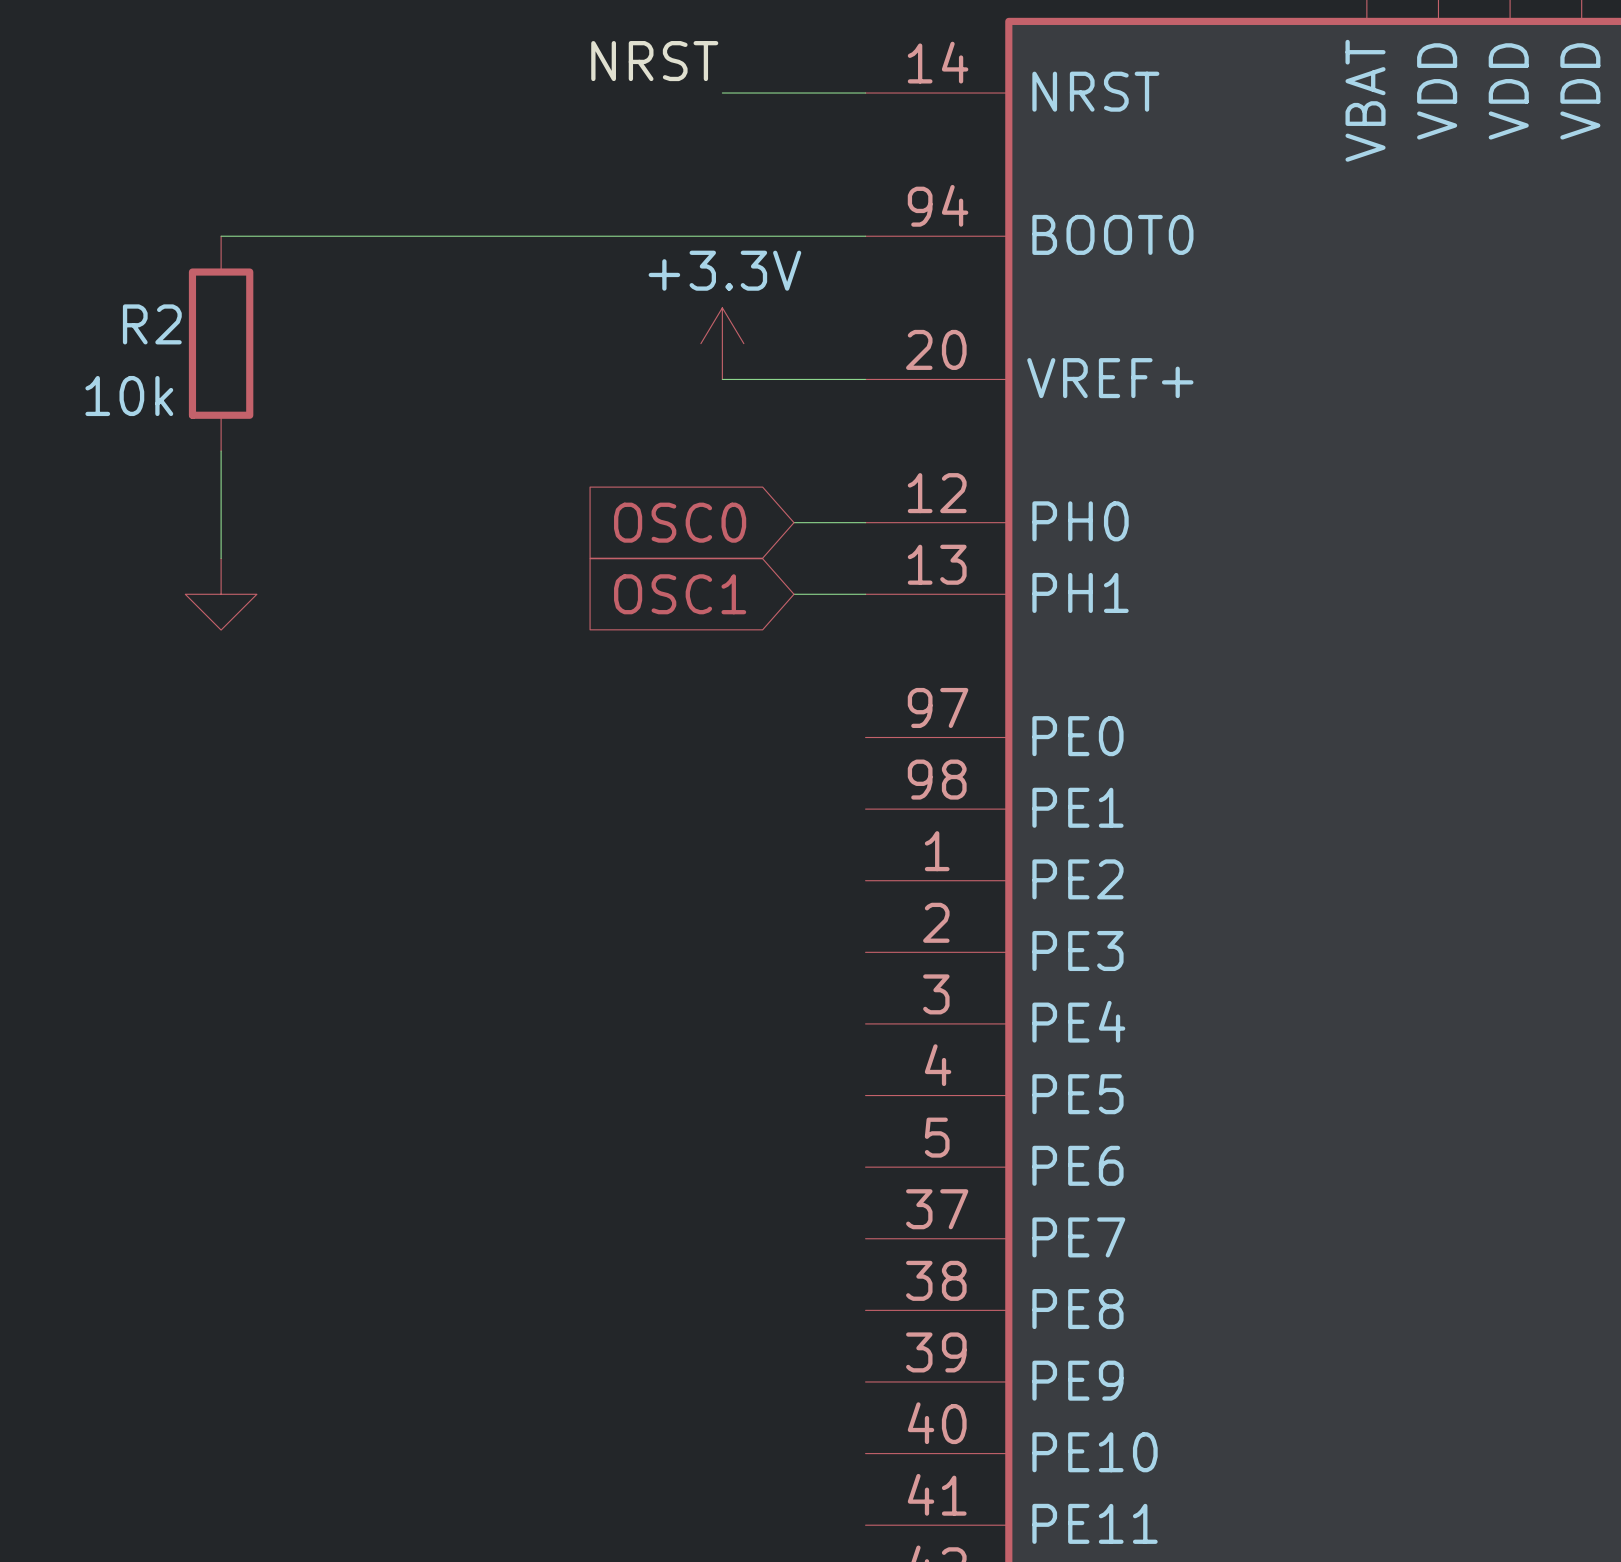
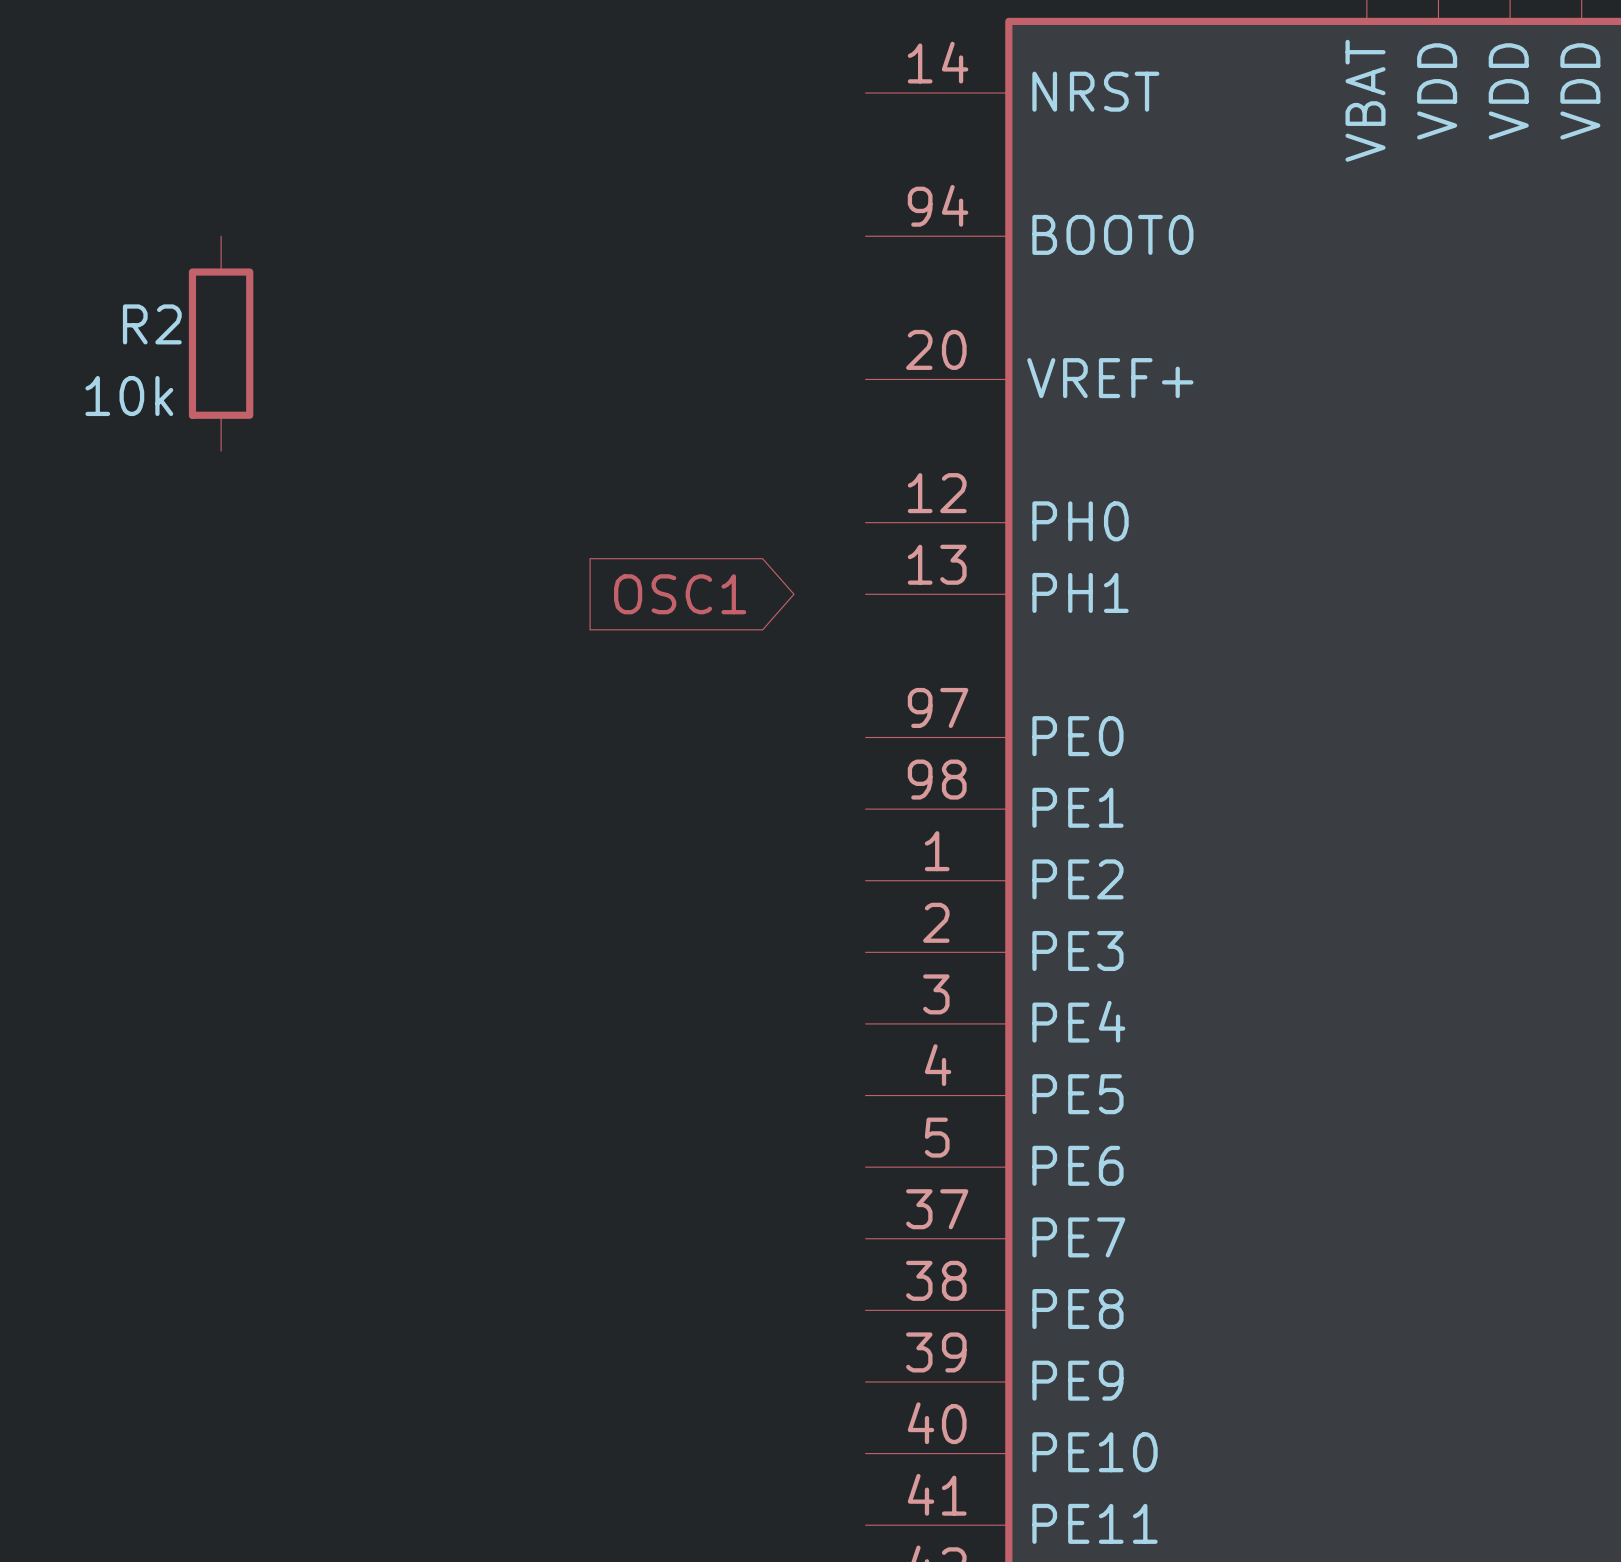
label: NRST (654, 61) -> none
wire: (722, 93) (865, 93) -> none
wire: (221, 236) (865, 236) -> none
power symbol: +3.3V (722, 343) -> none
wire: (722, 379) (865, 379) -> none
wire: (221, 451) (221, 558) -> none
global label: OSC0 (680, 522) -> none
wire: (793, 522) (865, 522) -> none
power symbol: (221, 594) -> none
wire: (793, 594) (865, 594) -> none

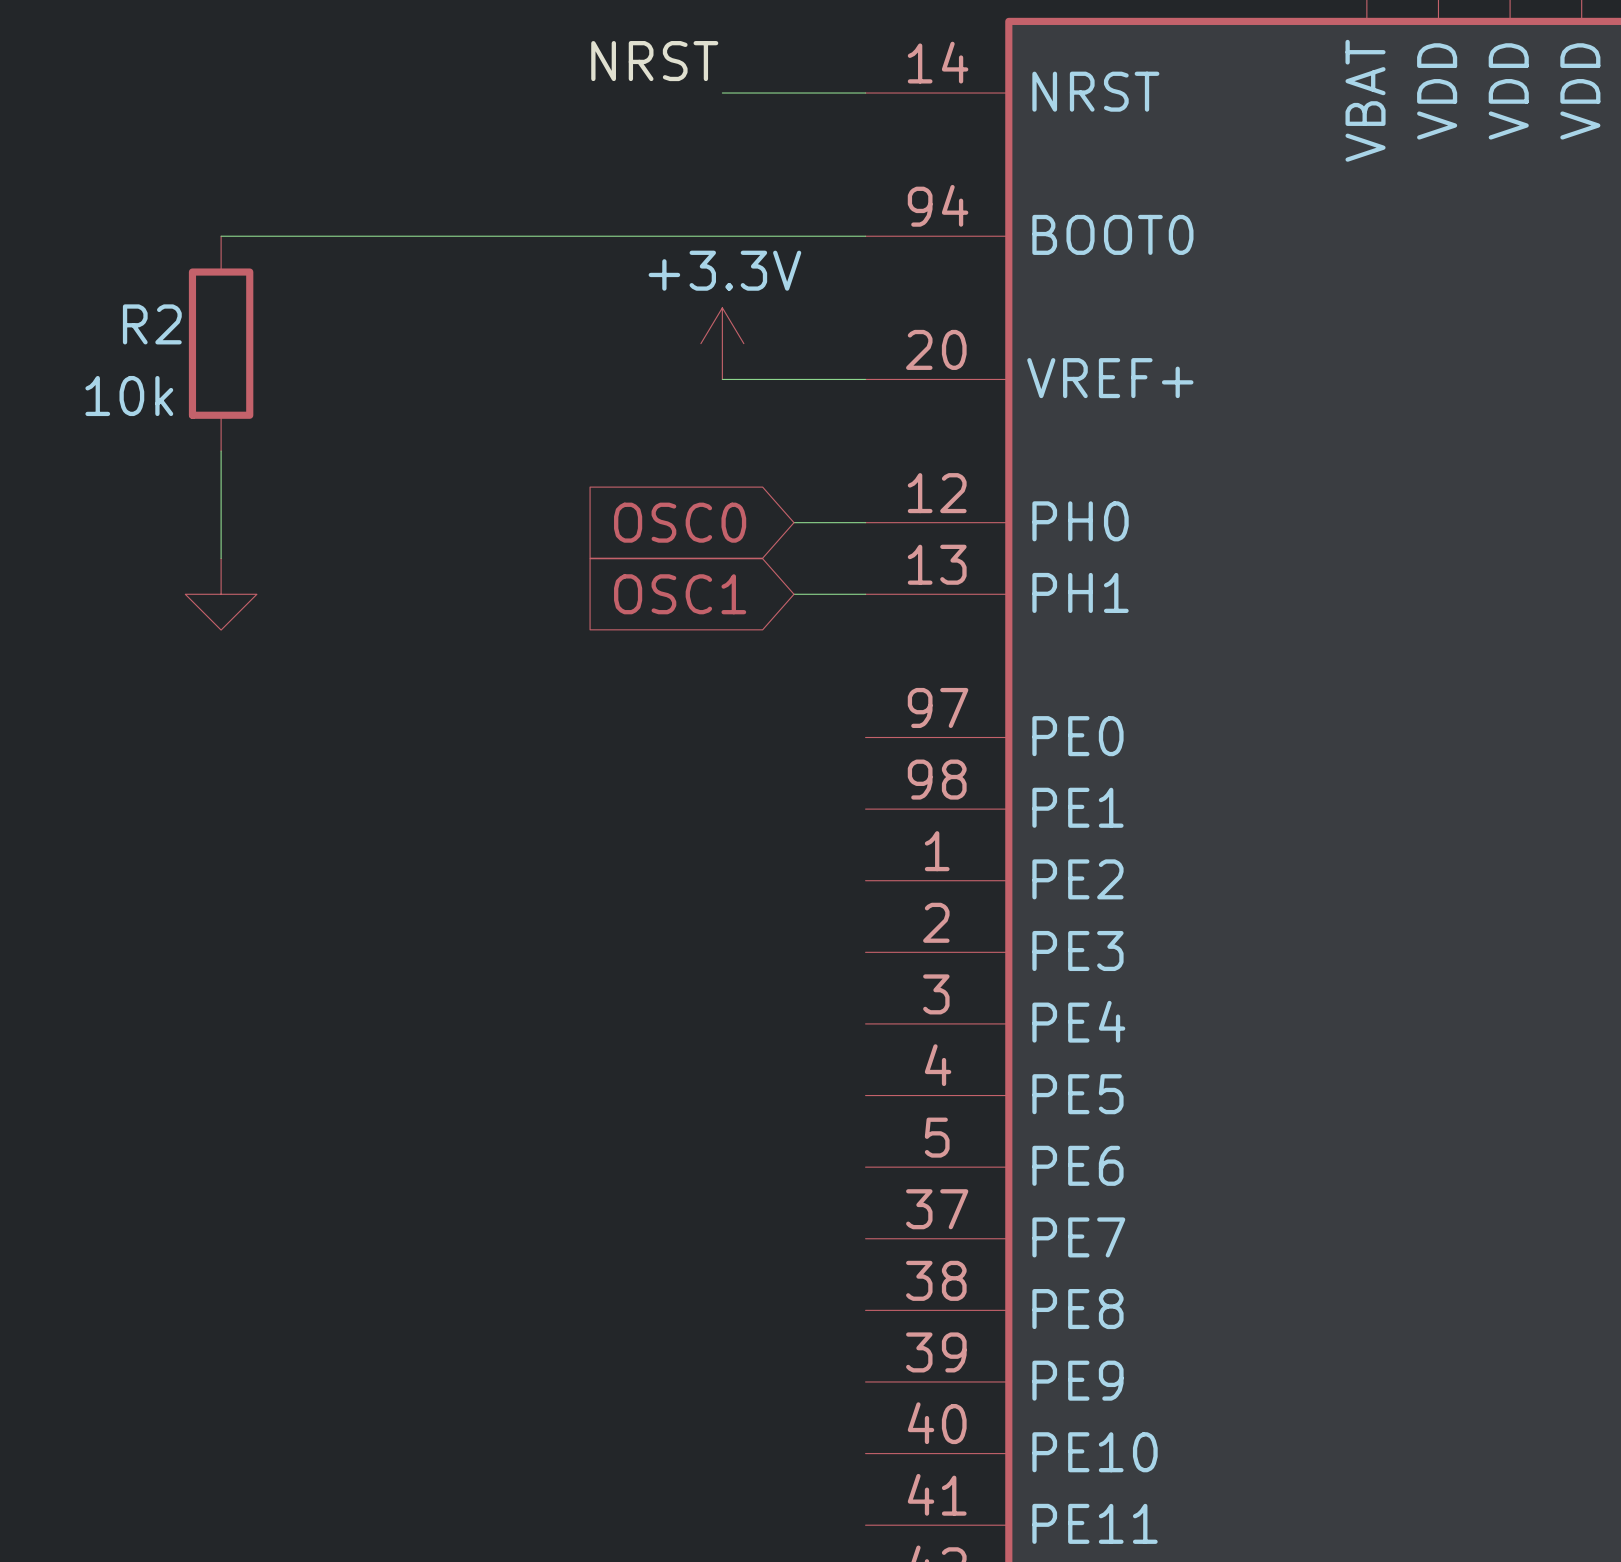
label: none -> NRST (654, 61)
wire: none -> (722, 93) (865, 93)
wire: none -> (221, 236) (865, 236)
power symbol: none -> +3.3V (722, 343)
wire: none -> (722, 379) (865, 379)
wire: none -> (221, 451) (221, 558)
global label: none -> OSC0 (680, 522)
wire: none -> (793, 522) (865, 522)
power symbol: none -> (221, 594)
wire: none -> (793, 594) (865, 594)

